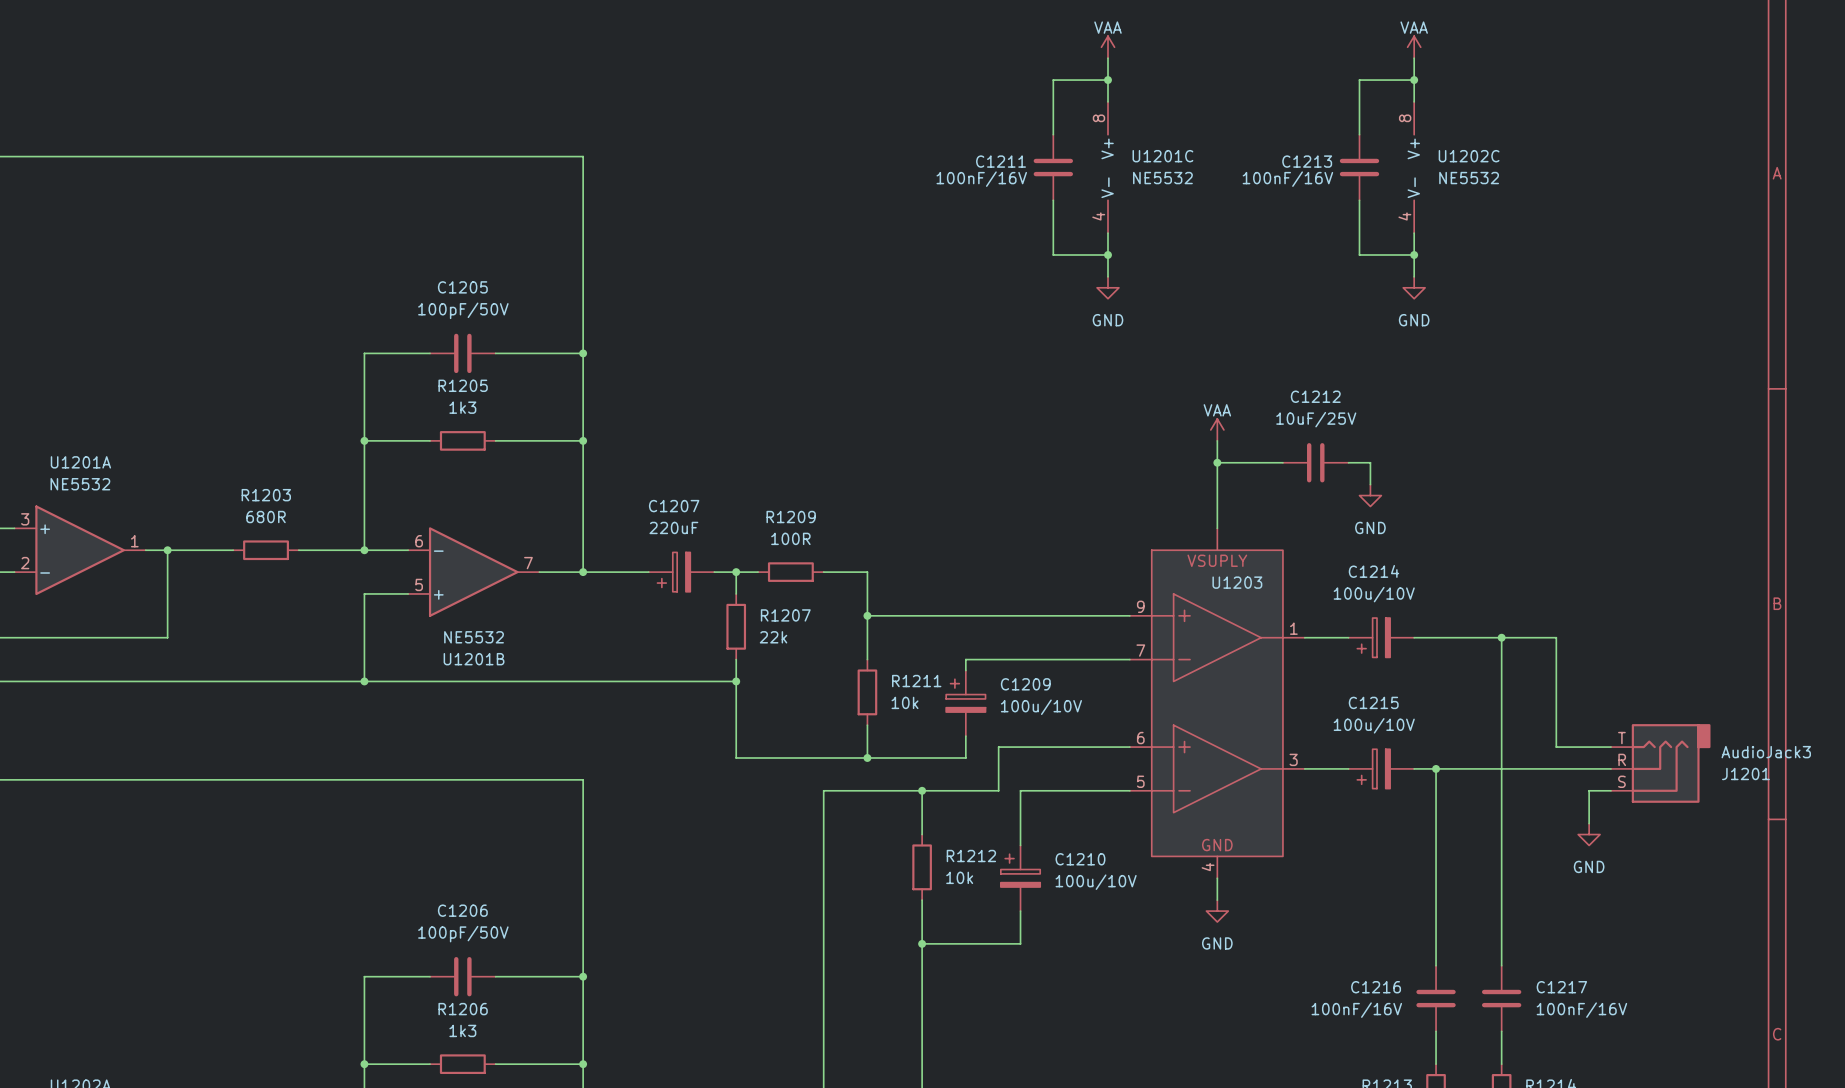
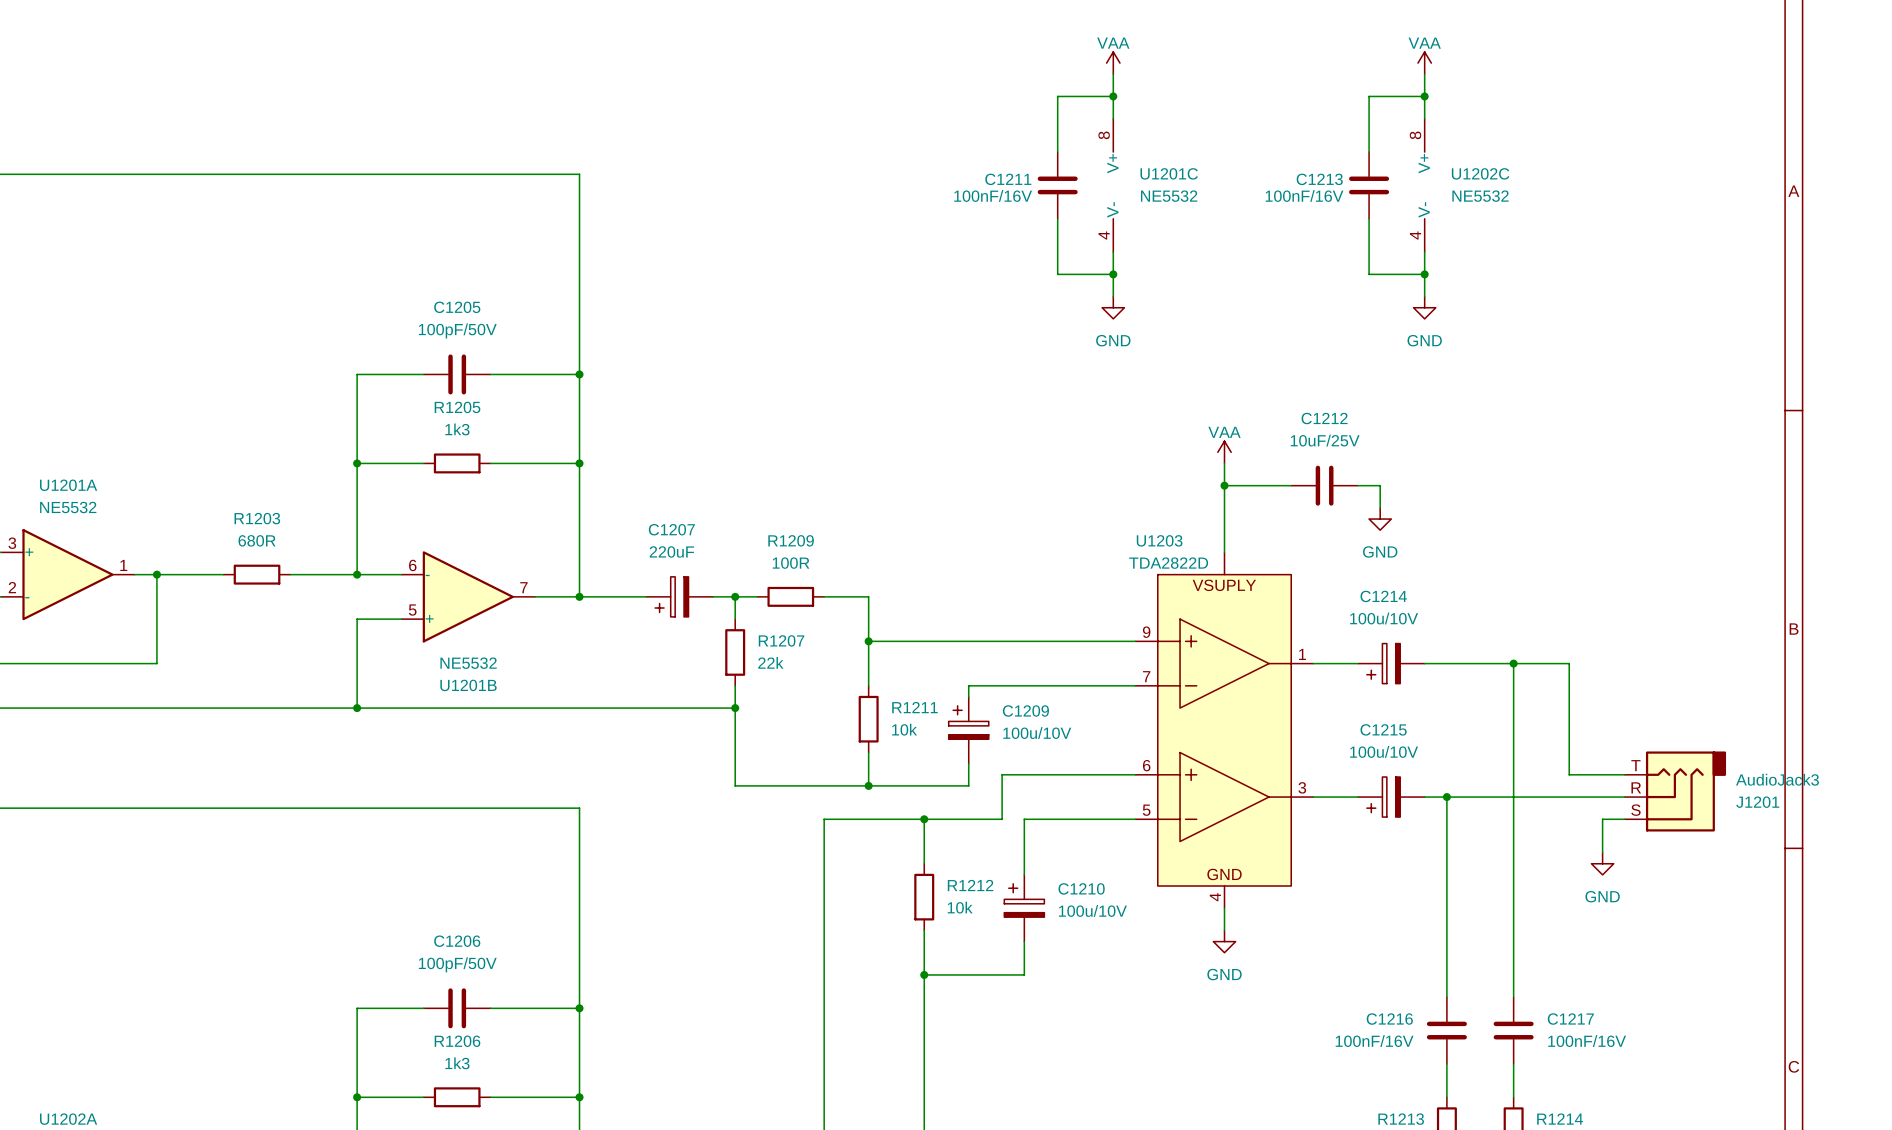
U1203 value: none -> TDA2822D (1168, 563)
U1203 name position: U1203 (1237, 582) -> U1203 (1159, 540)

